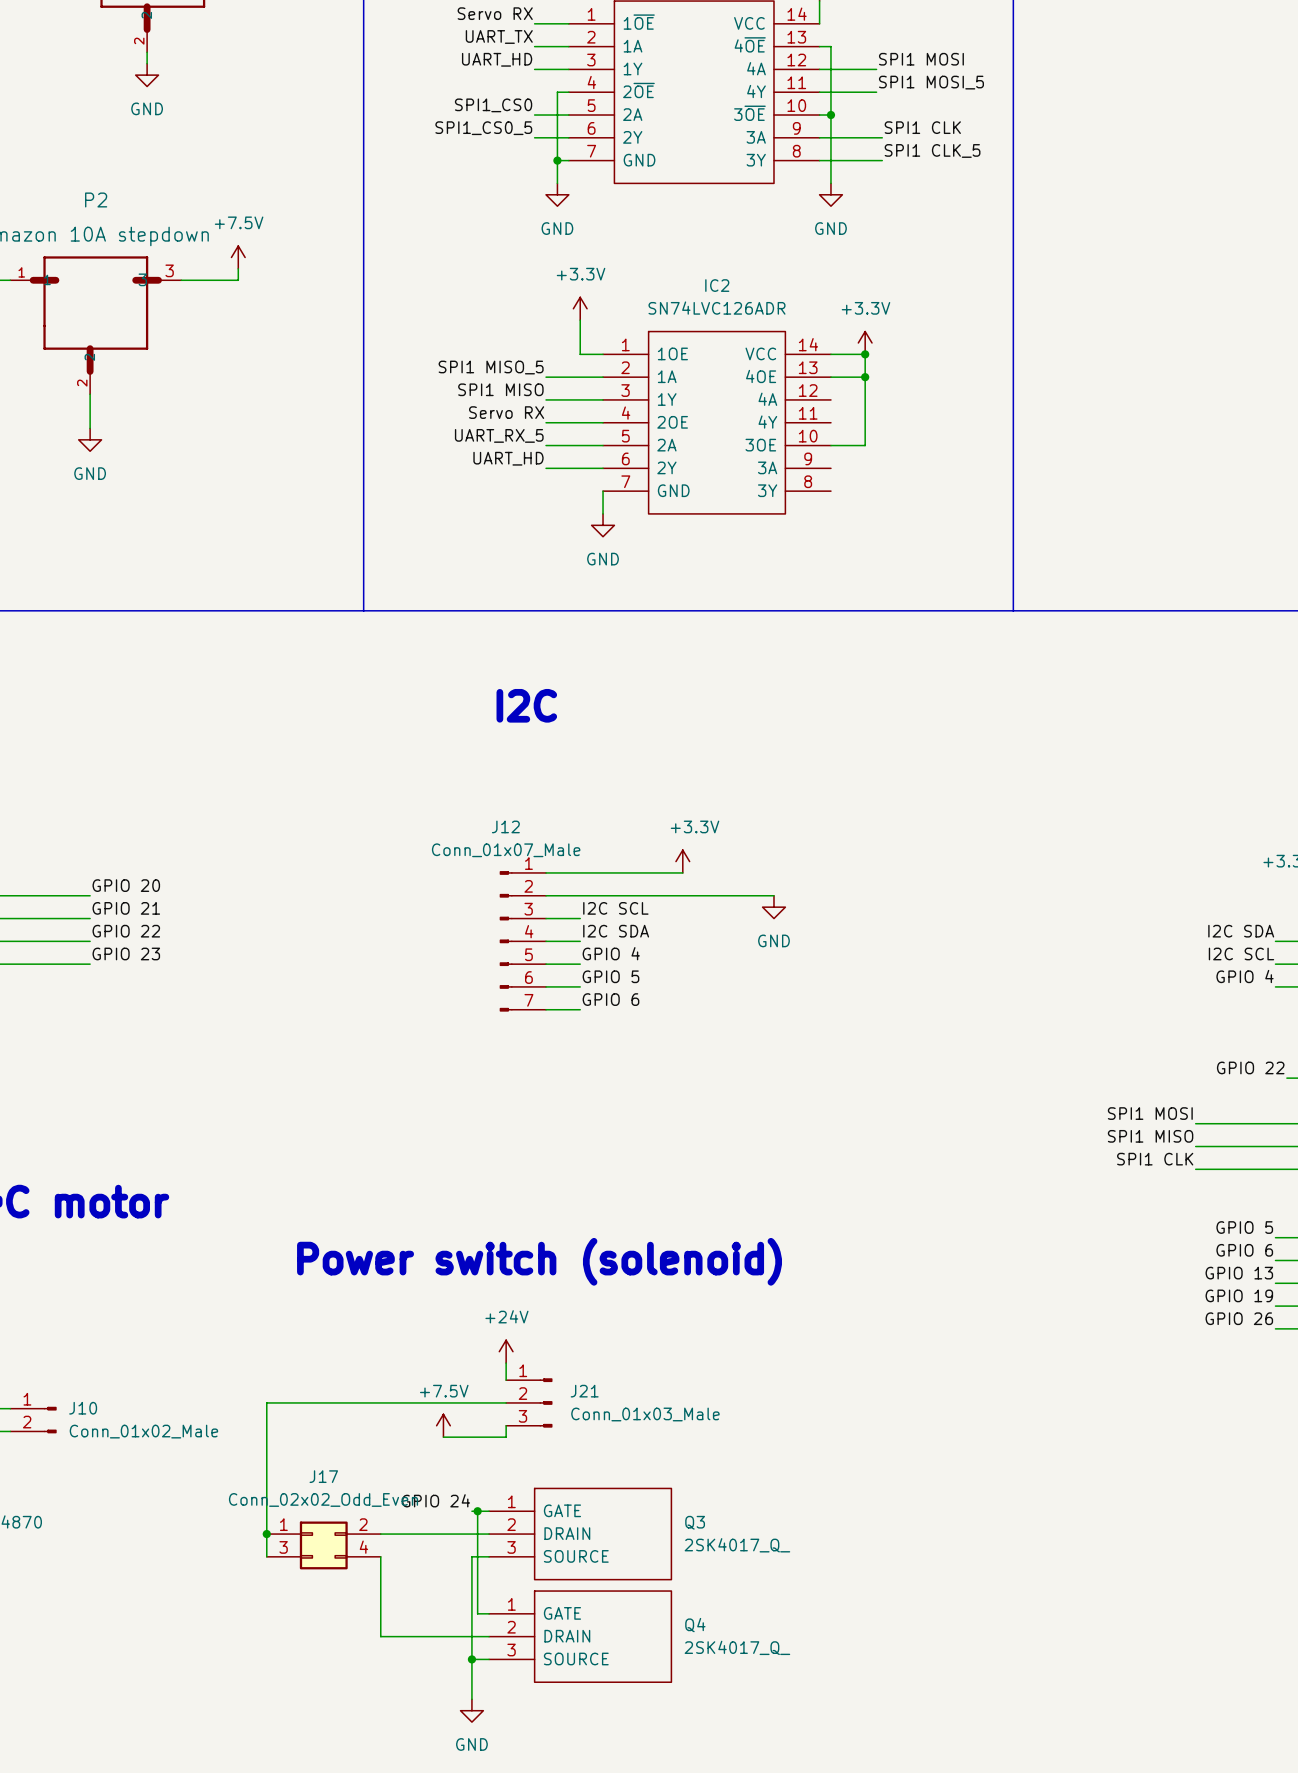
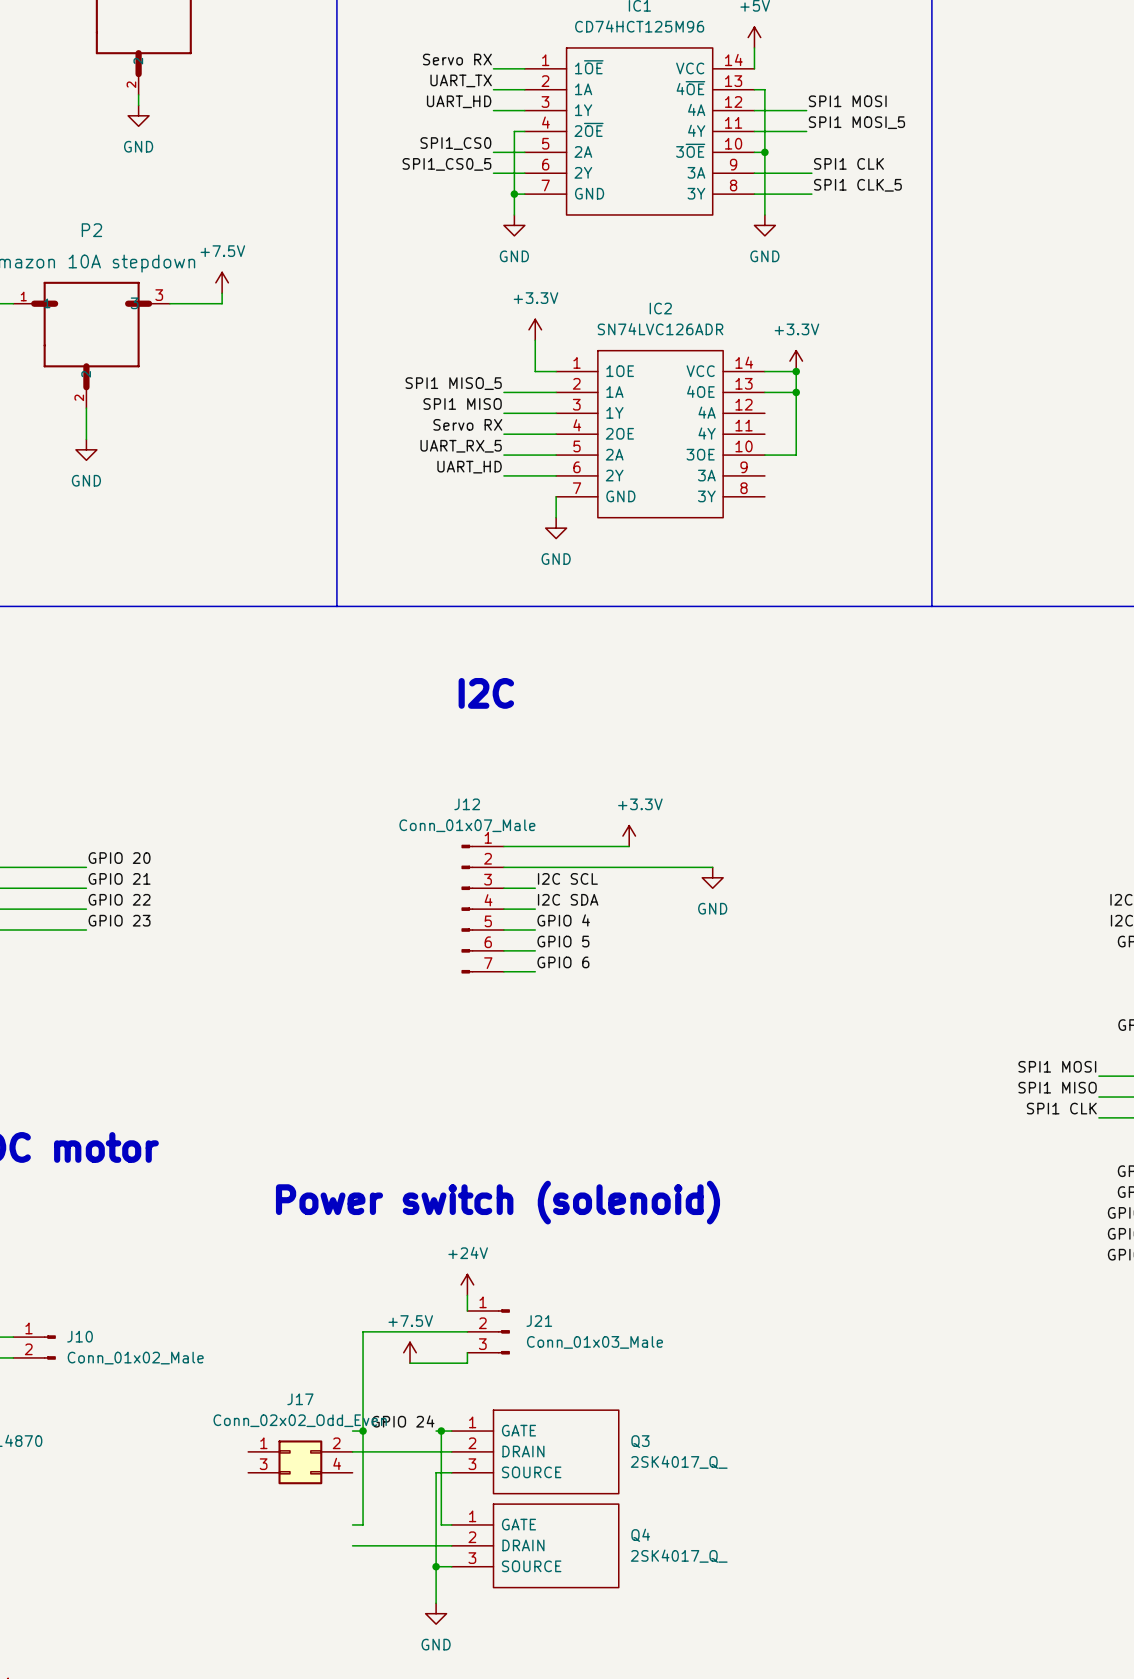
wire: (392, 1402) (266, 1402) (266, 1556) -> (363, 1331) (363, 1524) (352, 1524)
wire: none -> (352, 1431) (363, 1431)
junction: none -> (363, 1431)
junction: (266, 1534) -> none
wire: (380, 1556) (380, 1636) -> none

